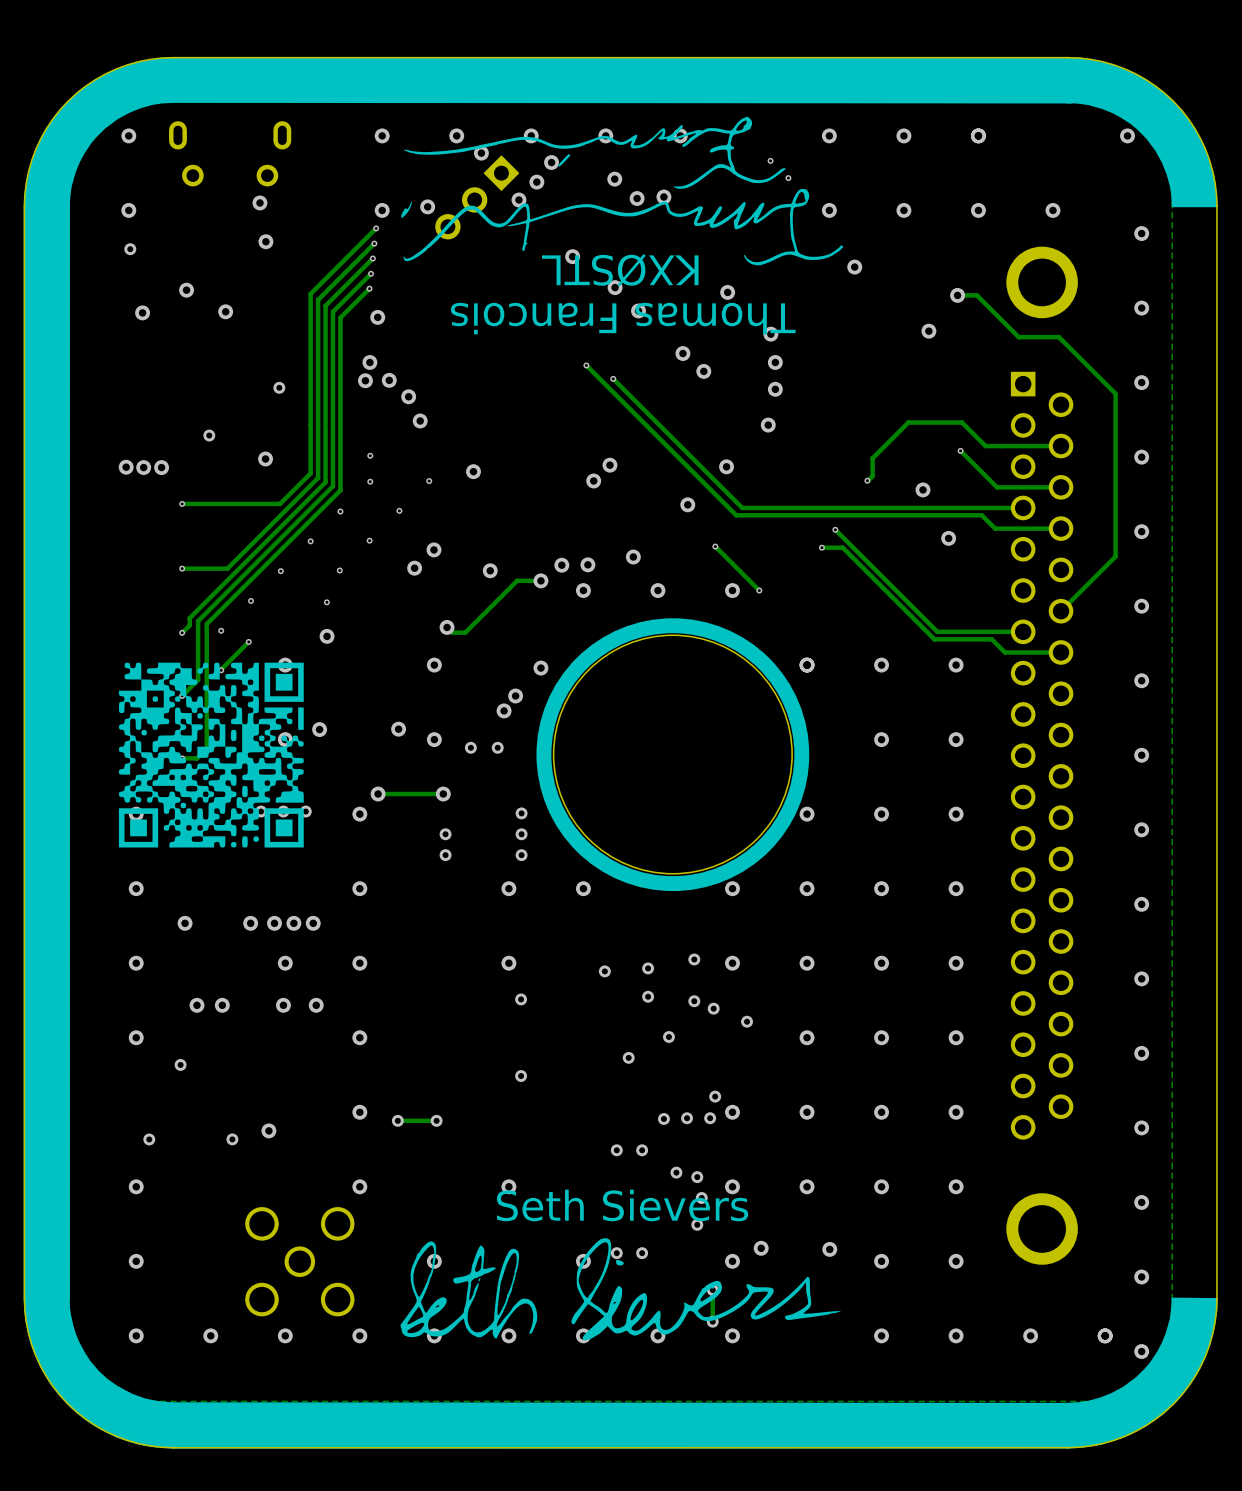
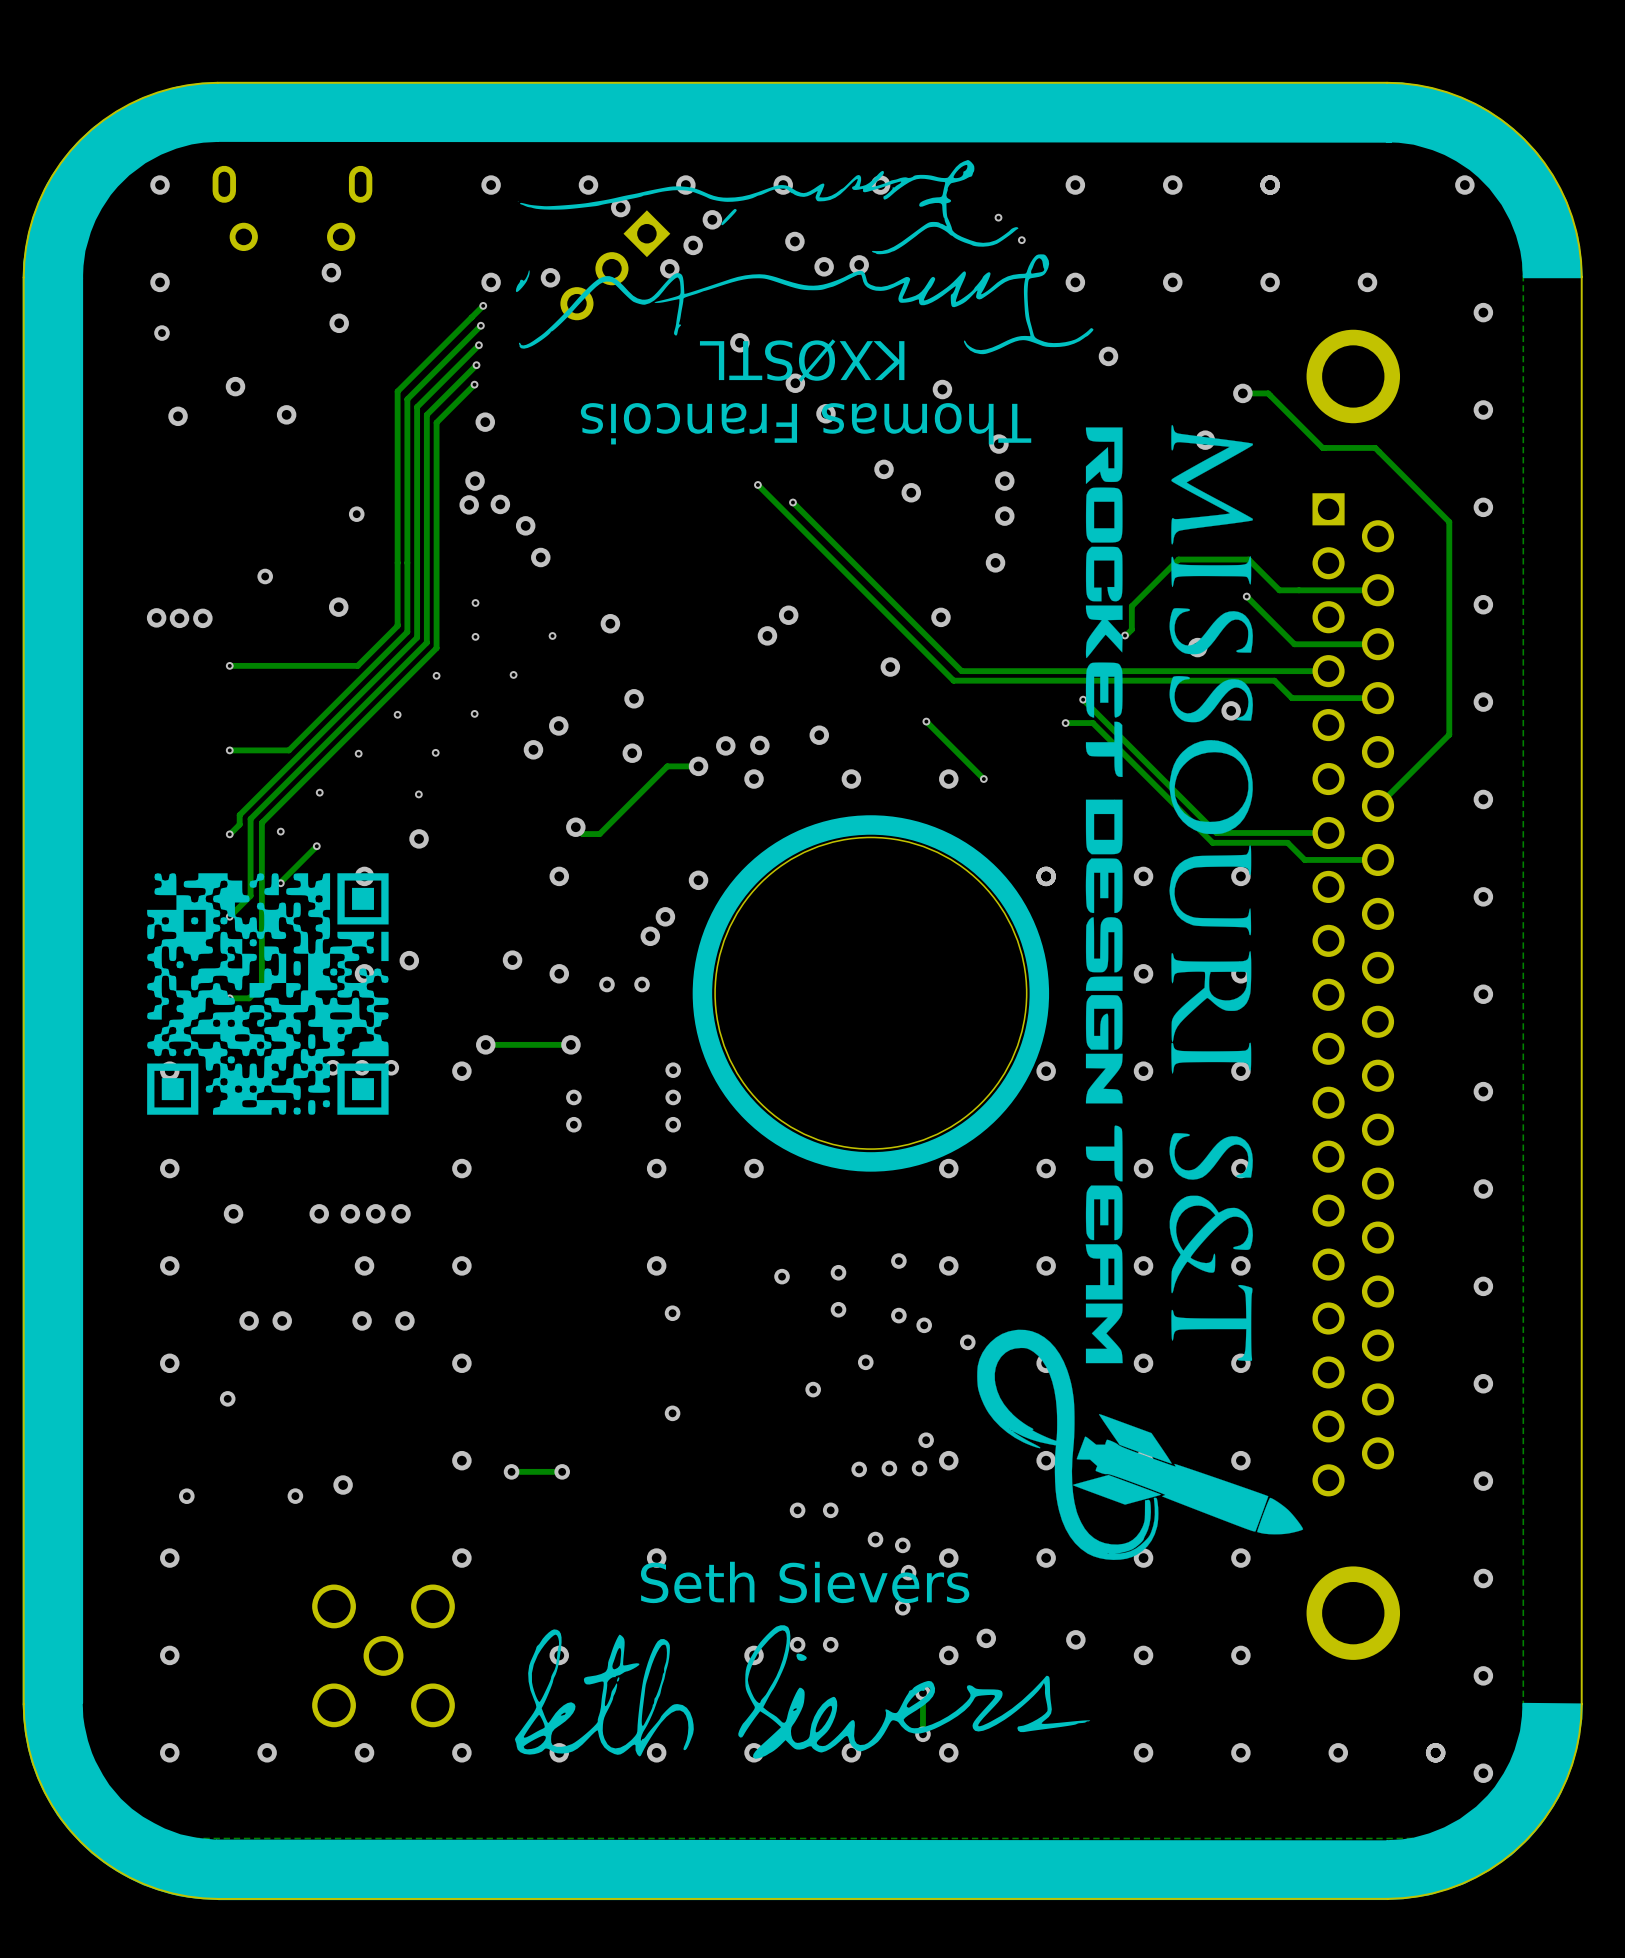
drawing: none -> [977, 424, 1304, 1560]
via: none -> (634, 698)

